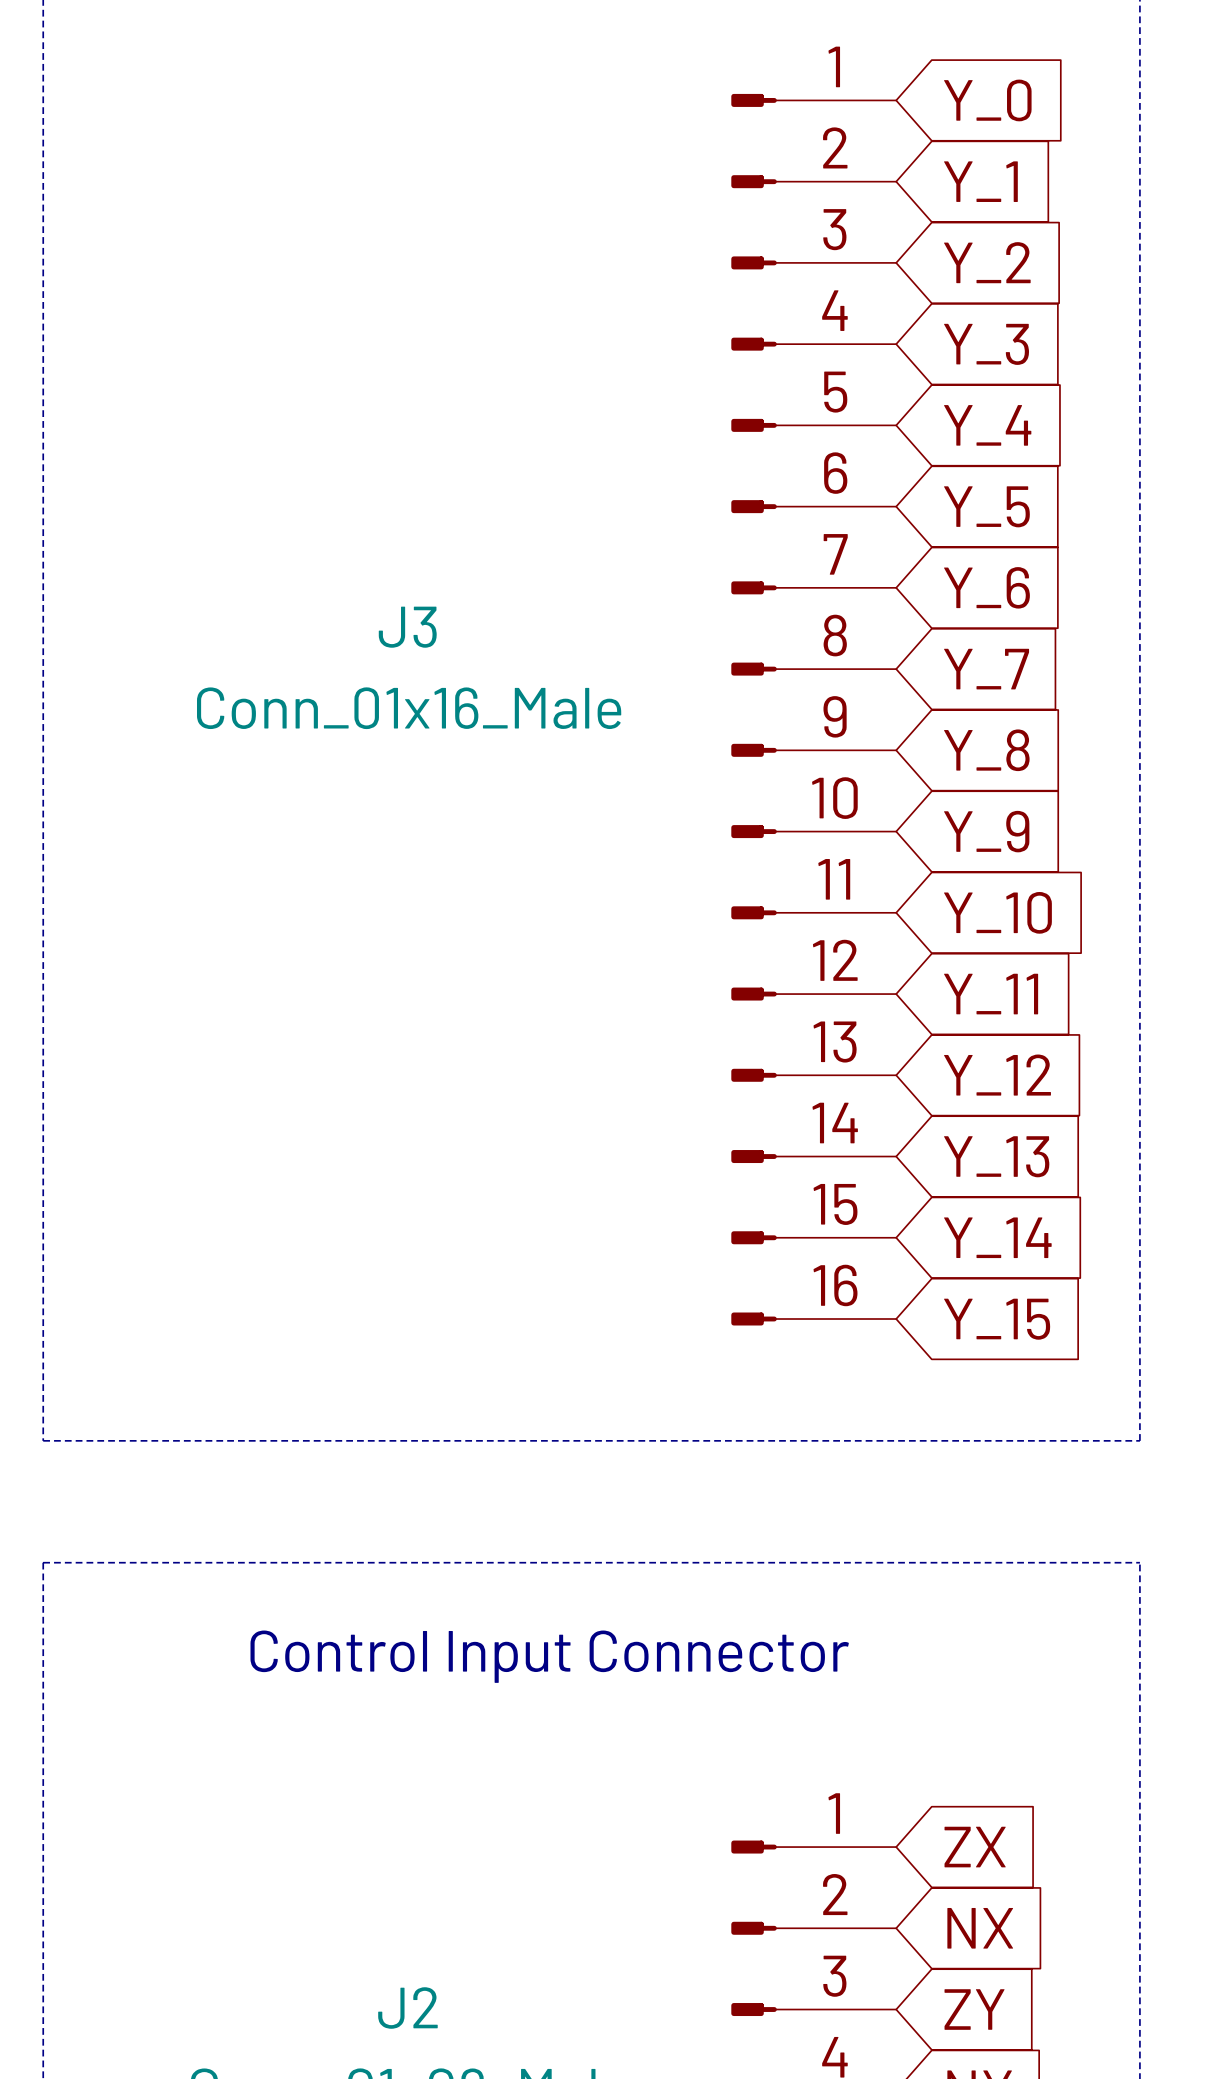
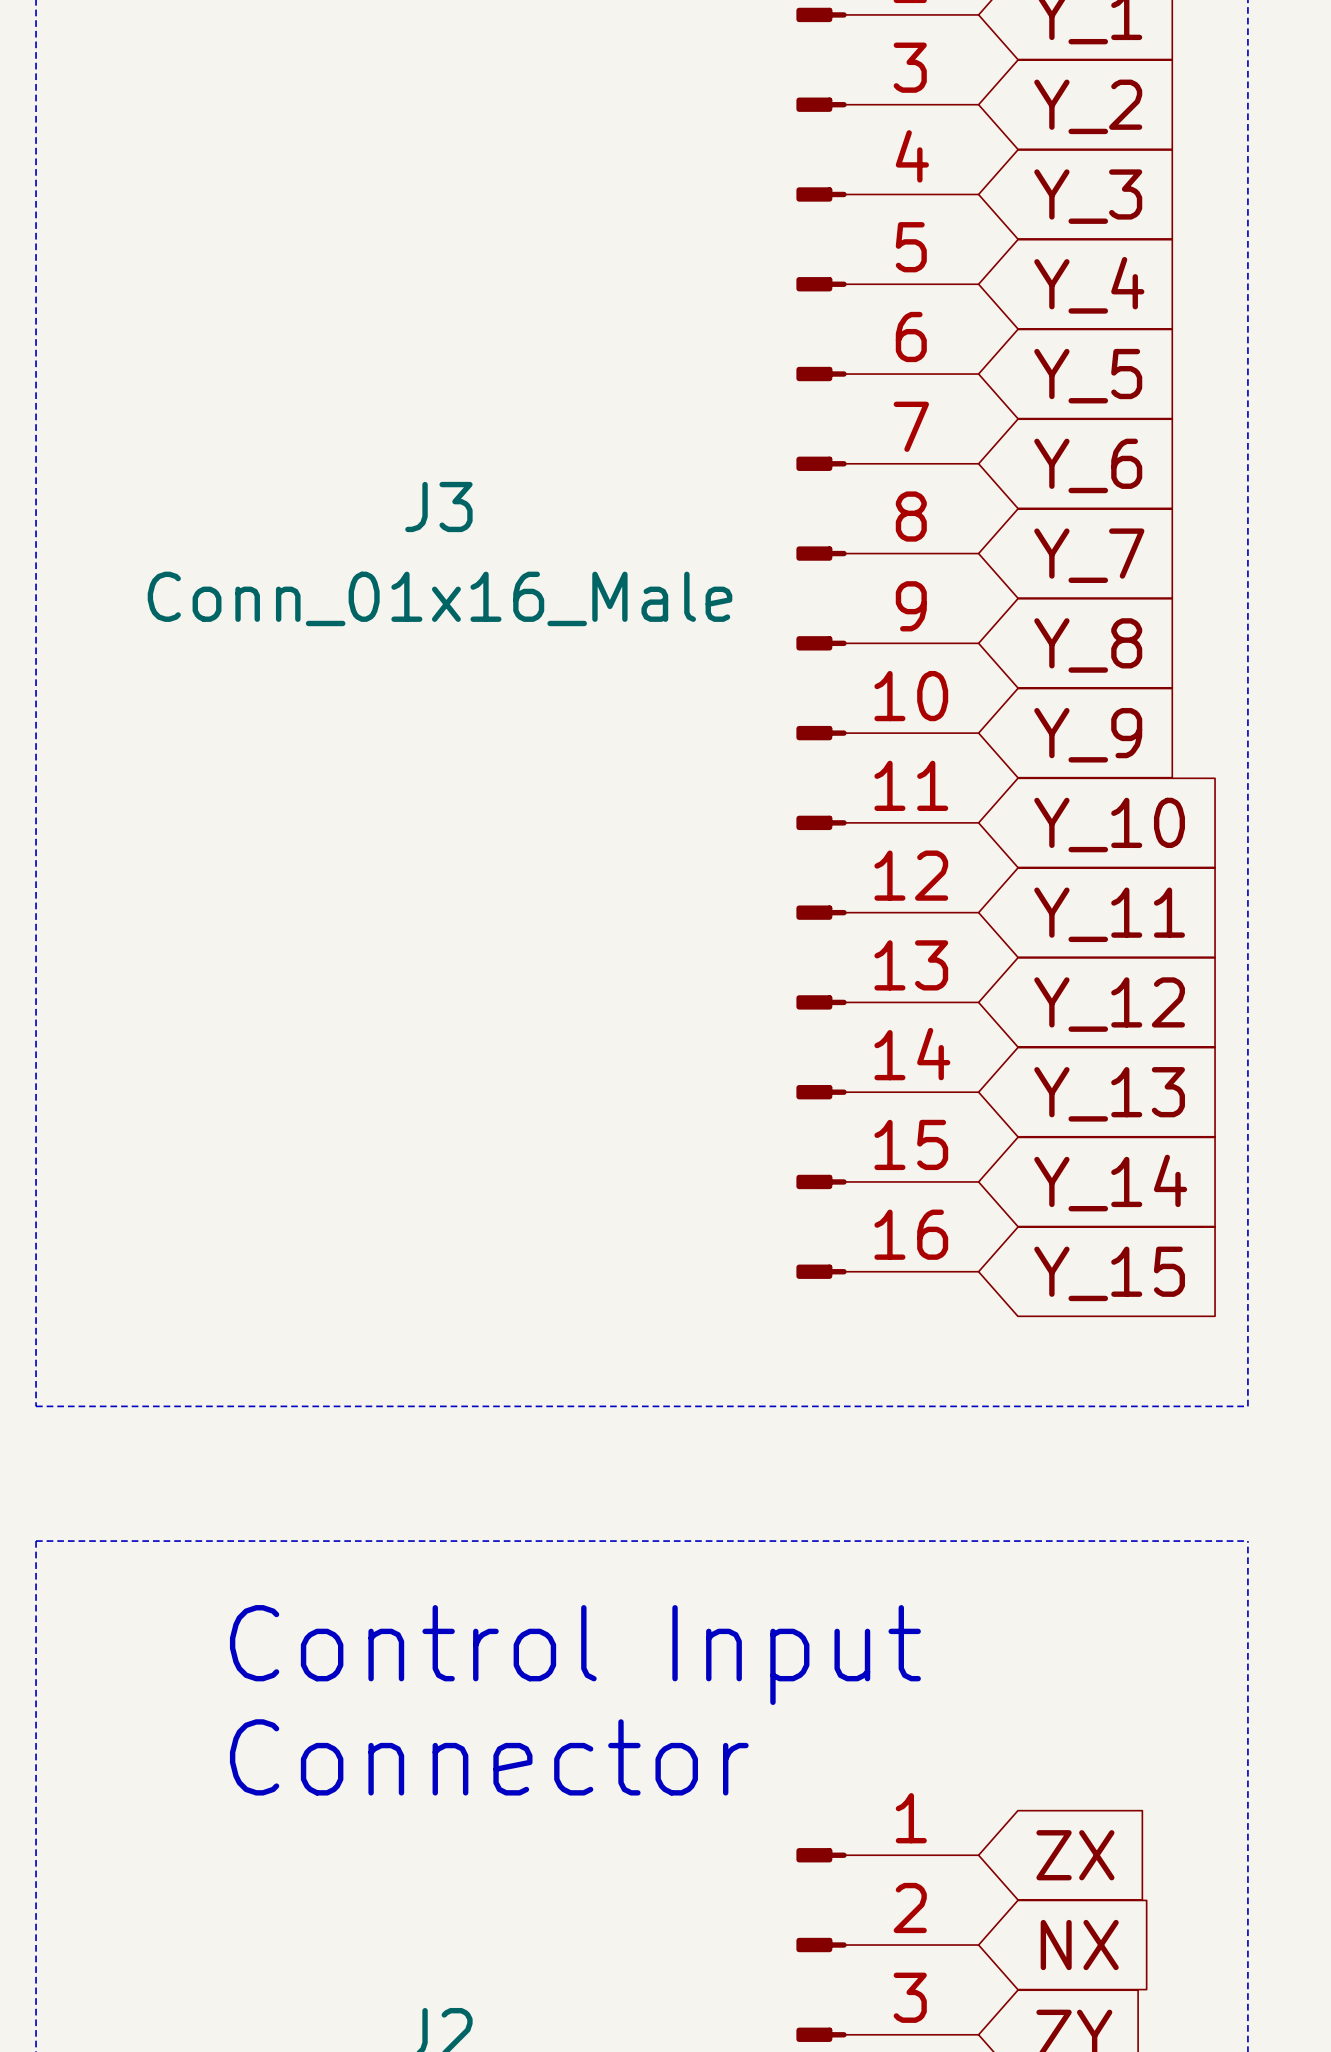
text: Control Input Connector (549, 1656) -> Control Input (575, 1655)
text: none -> Connector (489, 1757)

